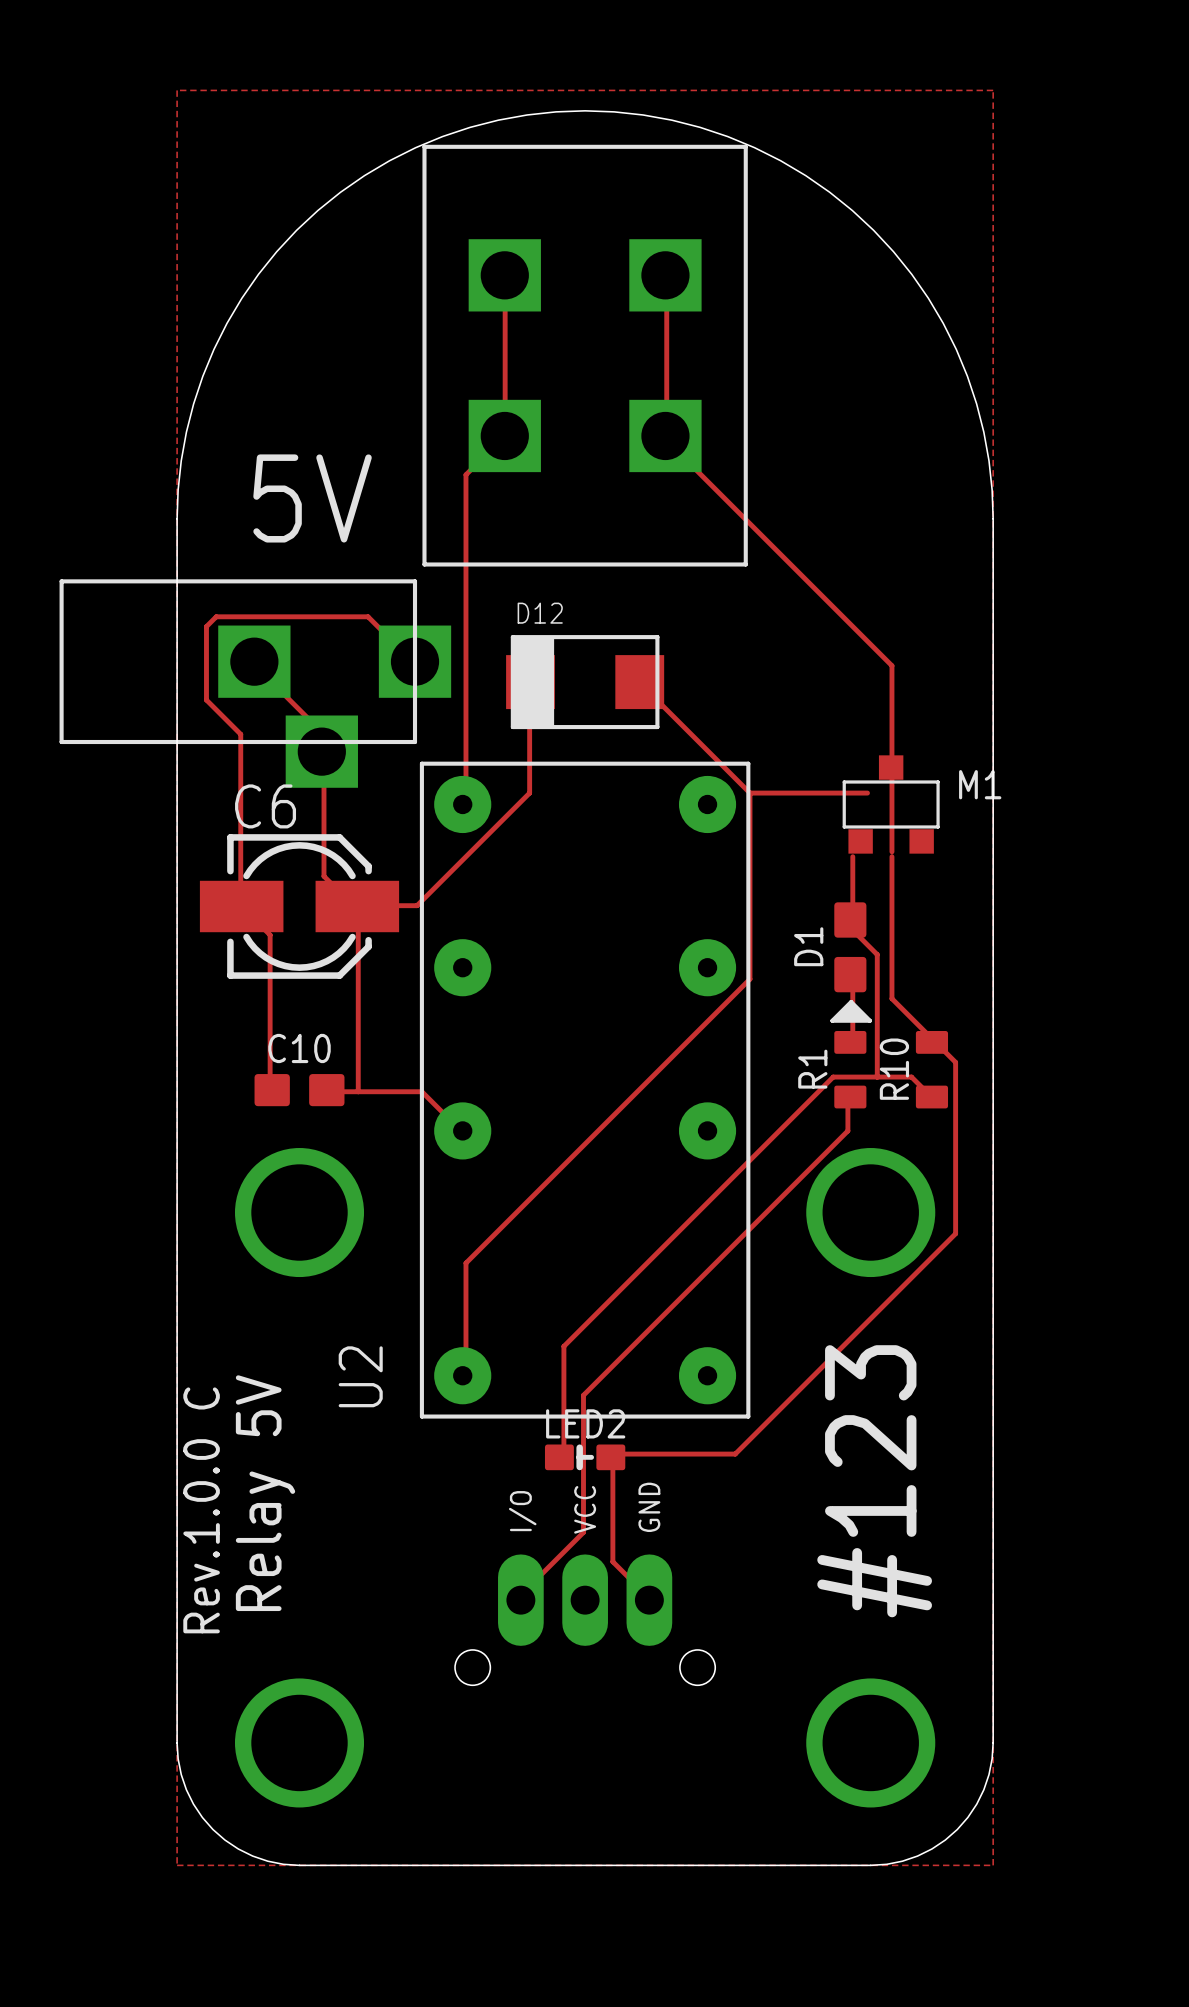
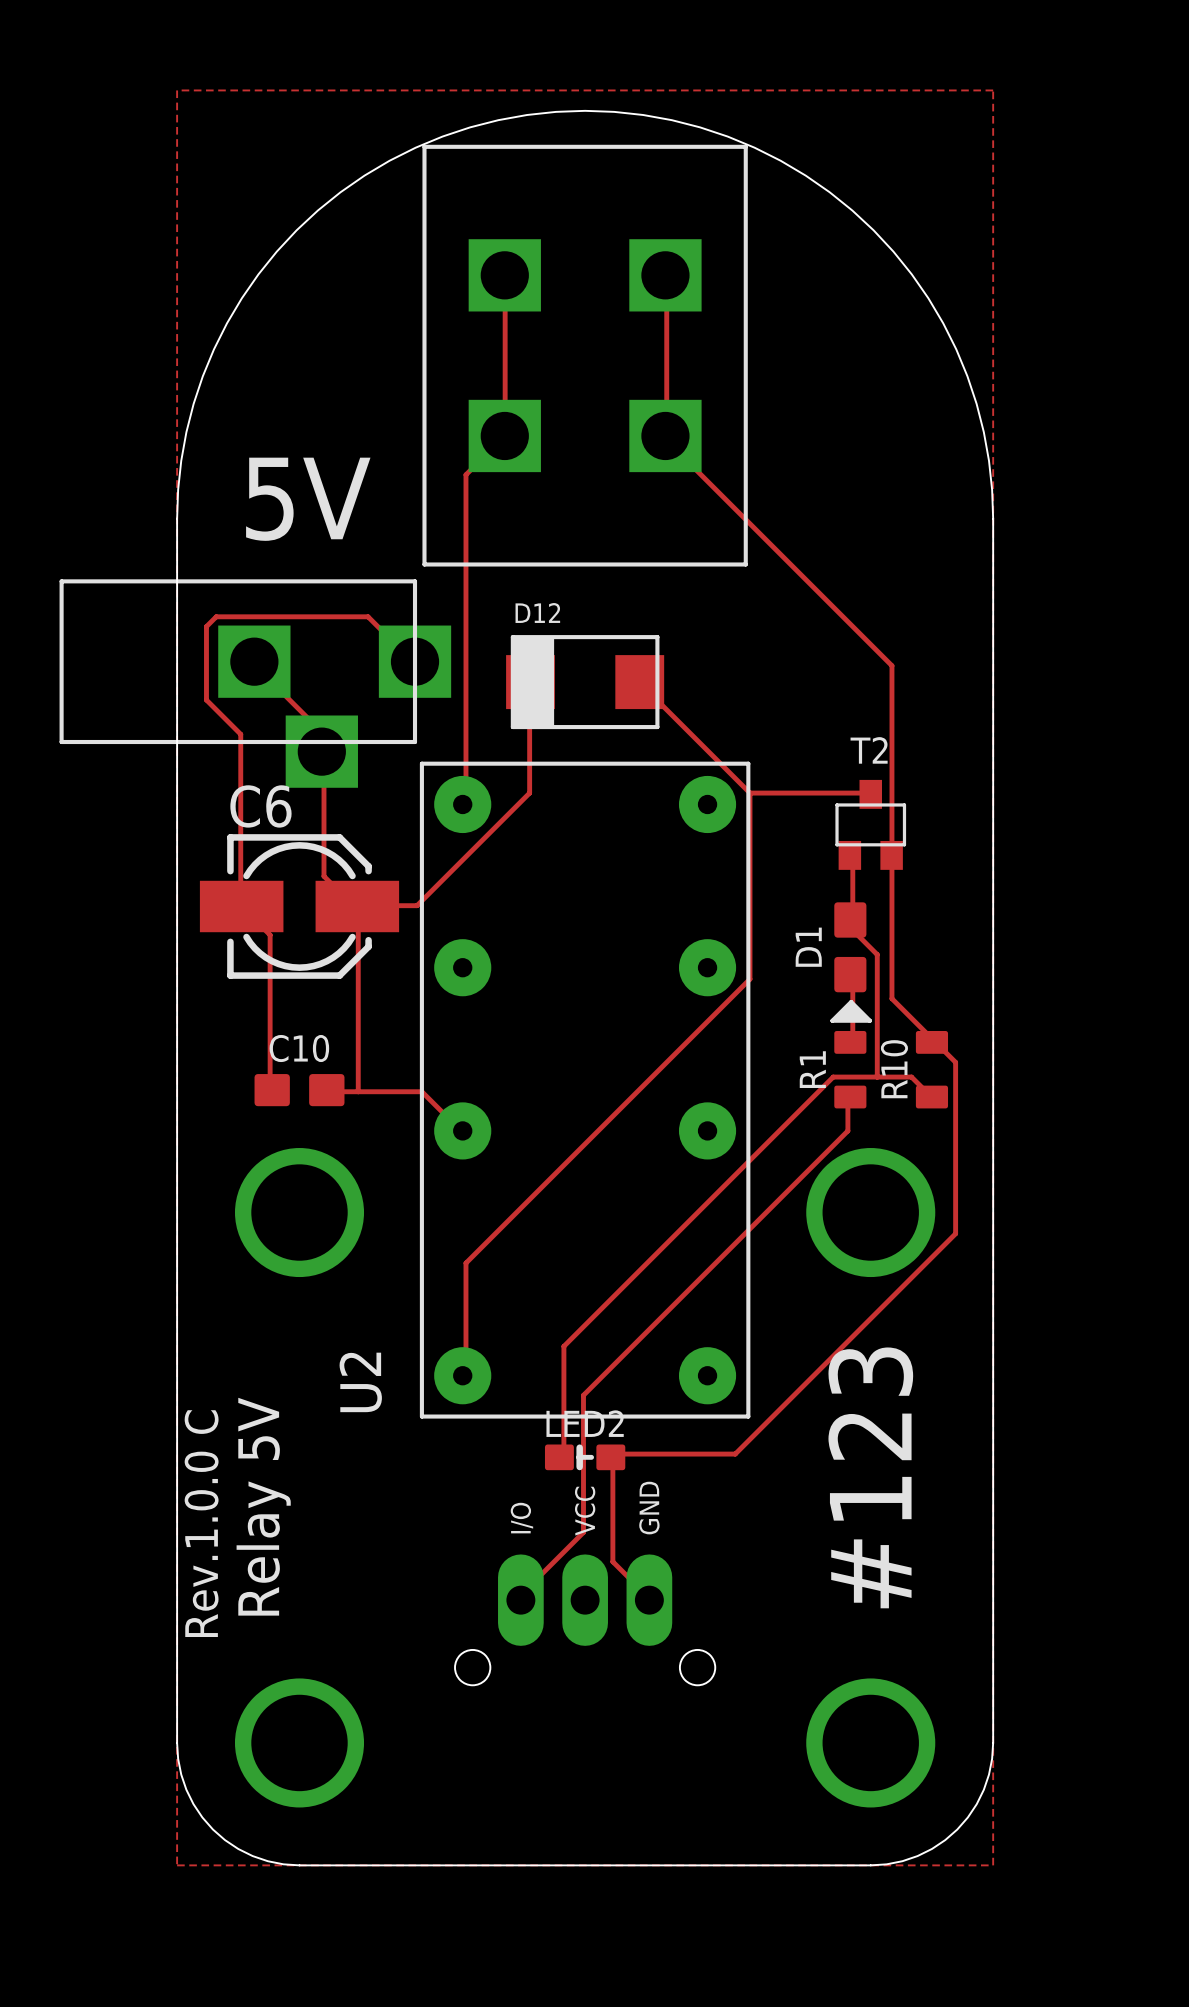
M1: (891, 804) -> none
T2: none -> (870, 824)

